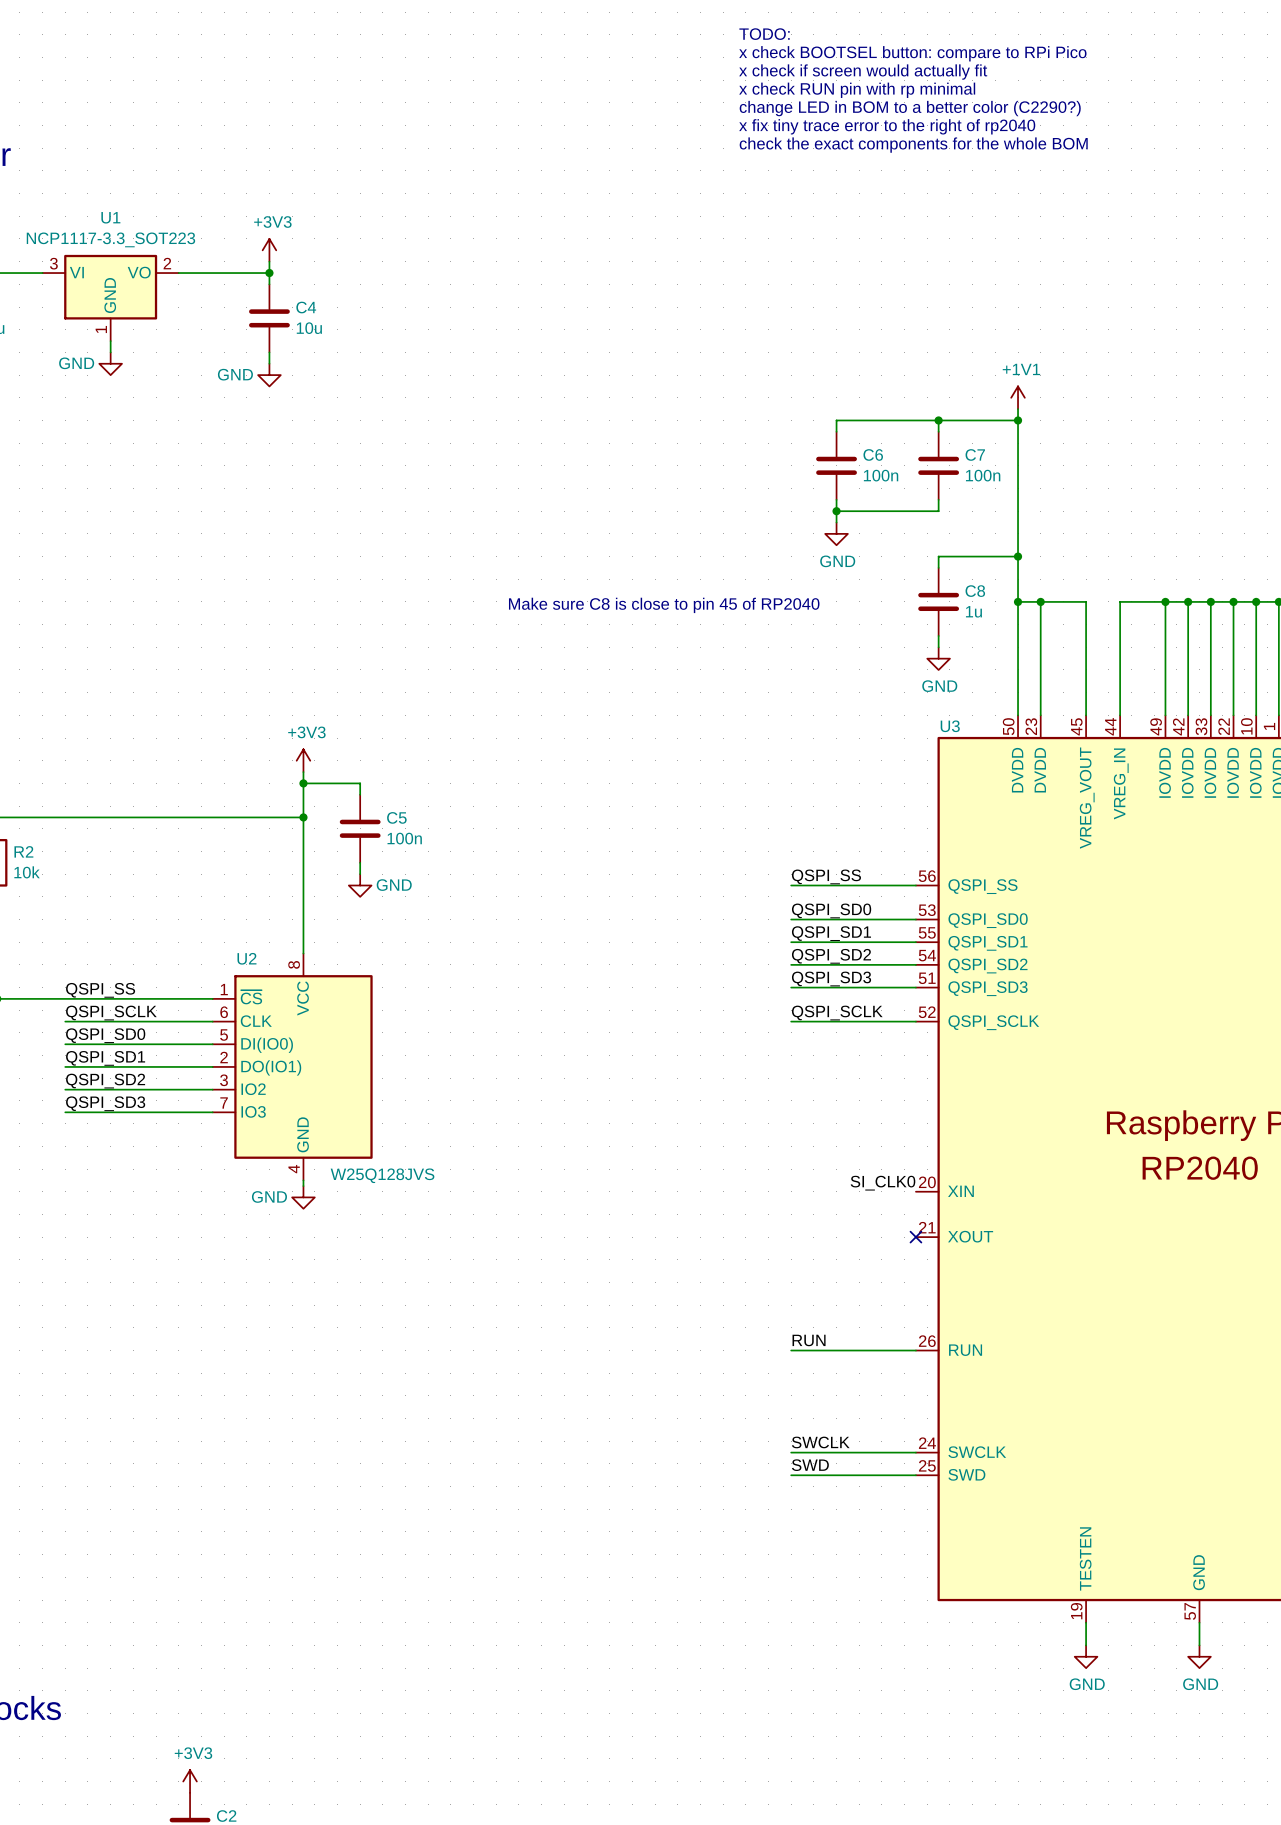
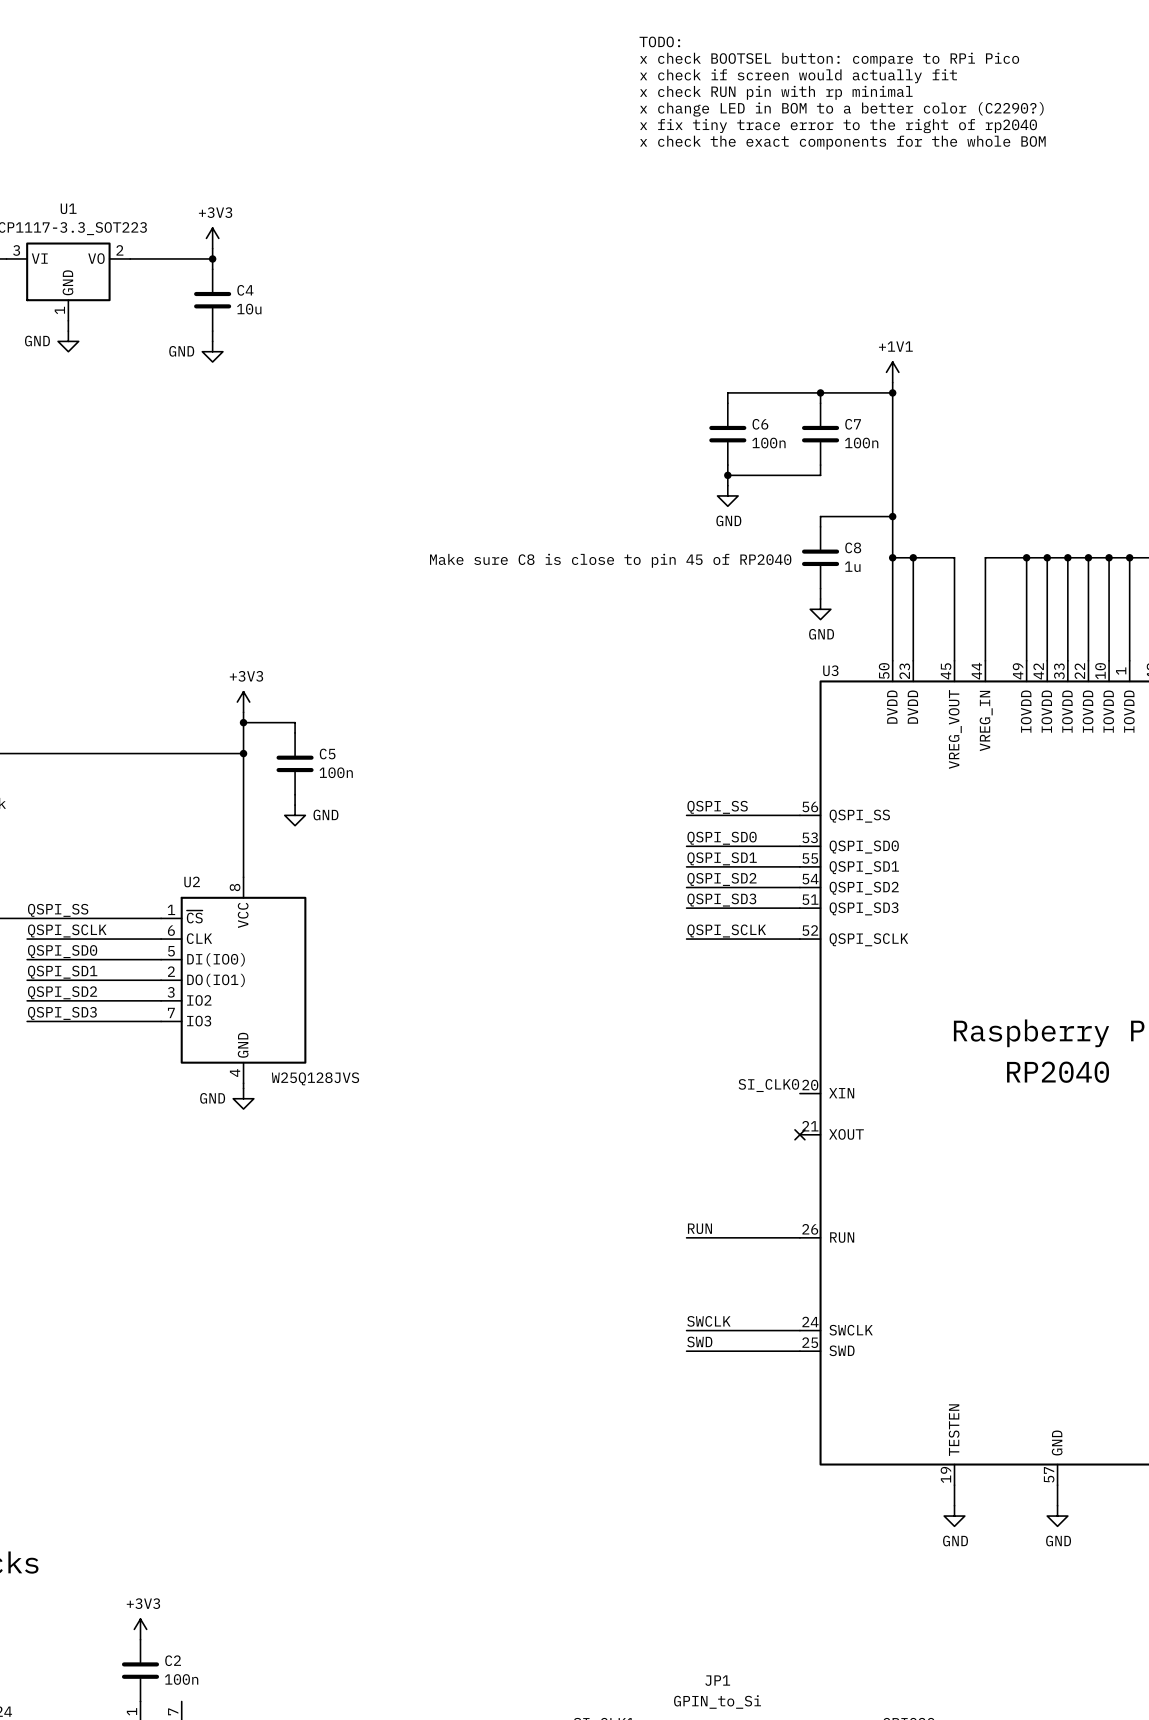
text: change LED in BOM to a better color (C2290?) (910, 108) -> x change LED in BOM to a better color (C2290?) (841, 109)
text: check the exact components for the whole BOM (913, 145) -> x check the exact components for the whole BOM (842, 142)

